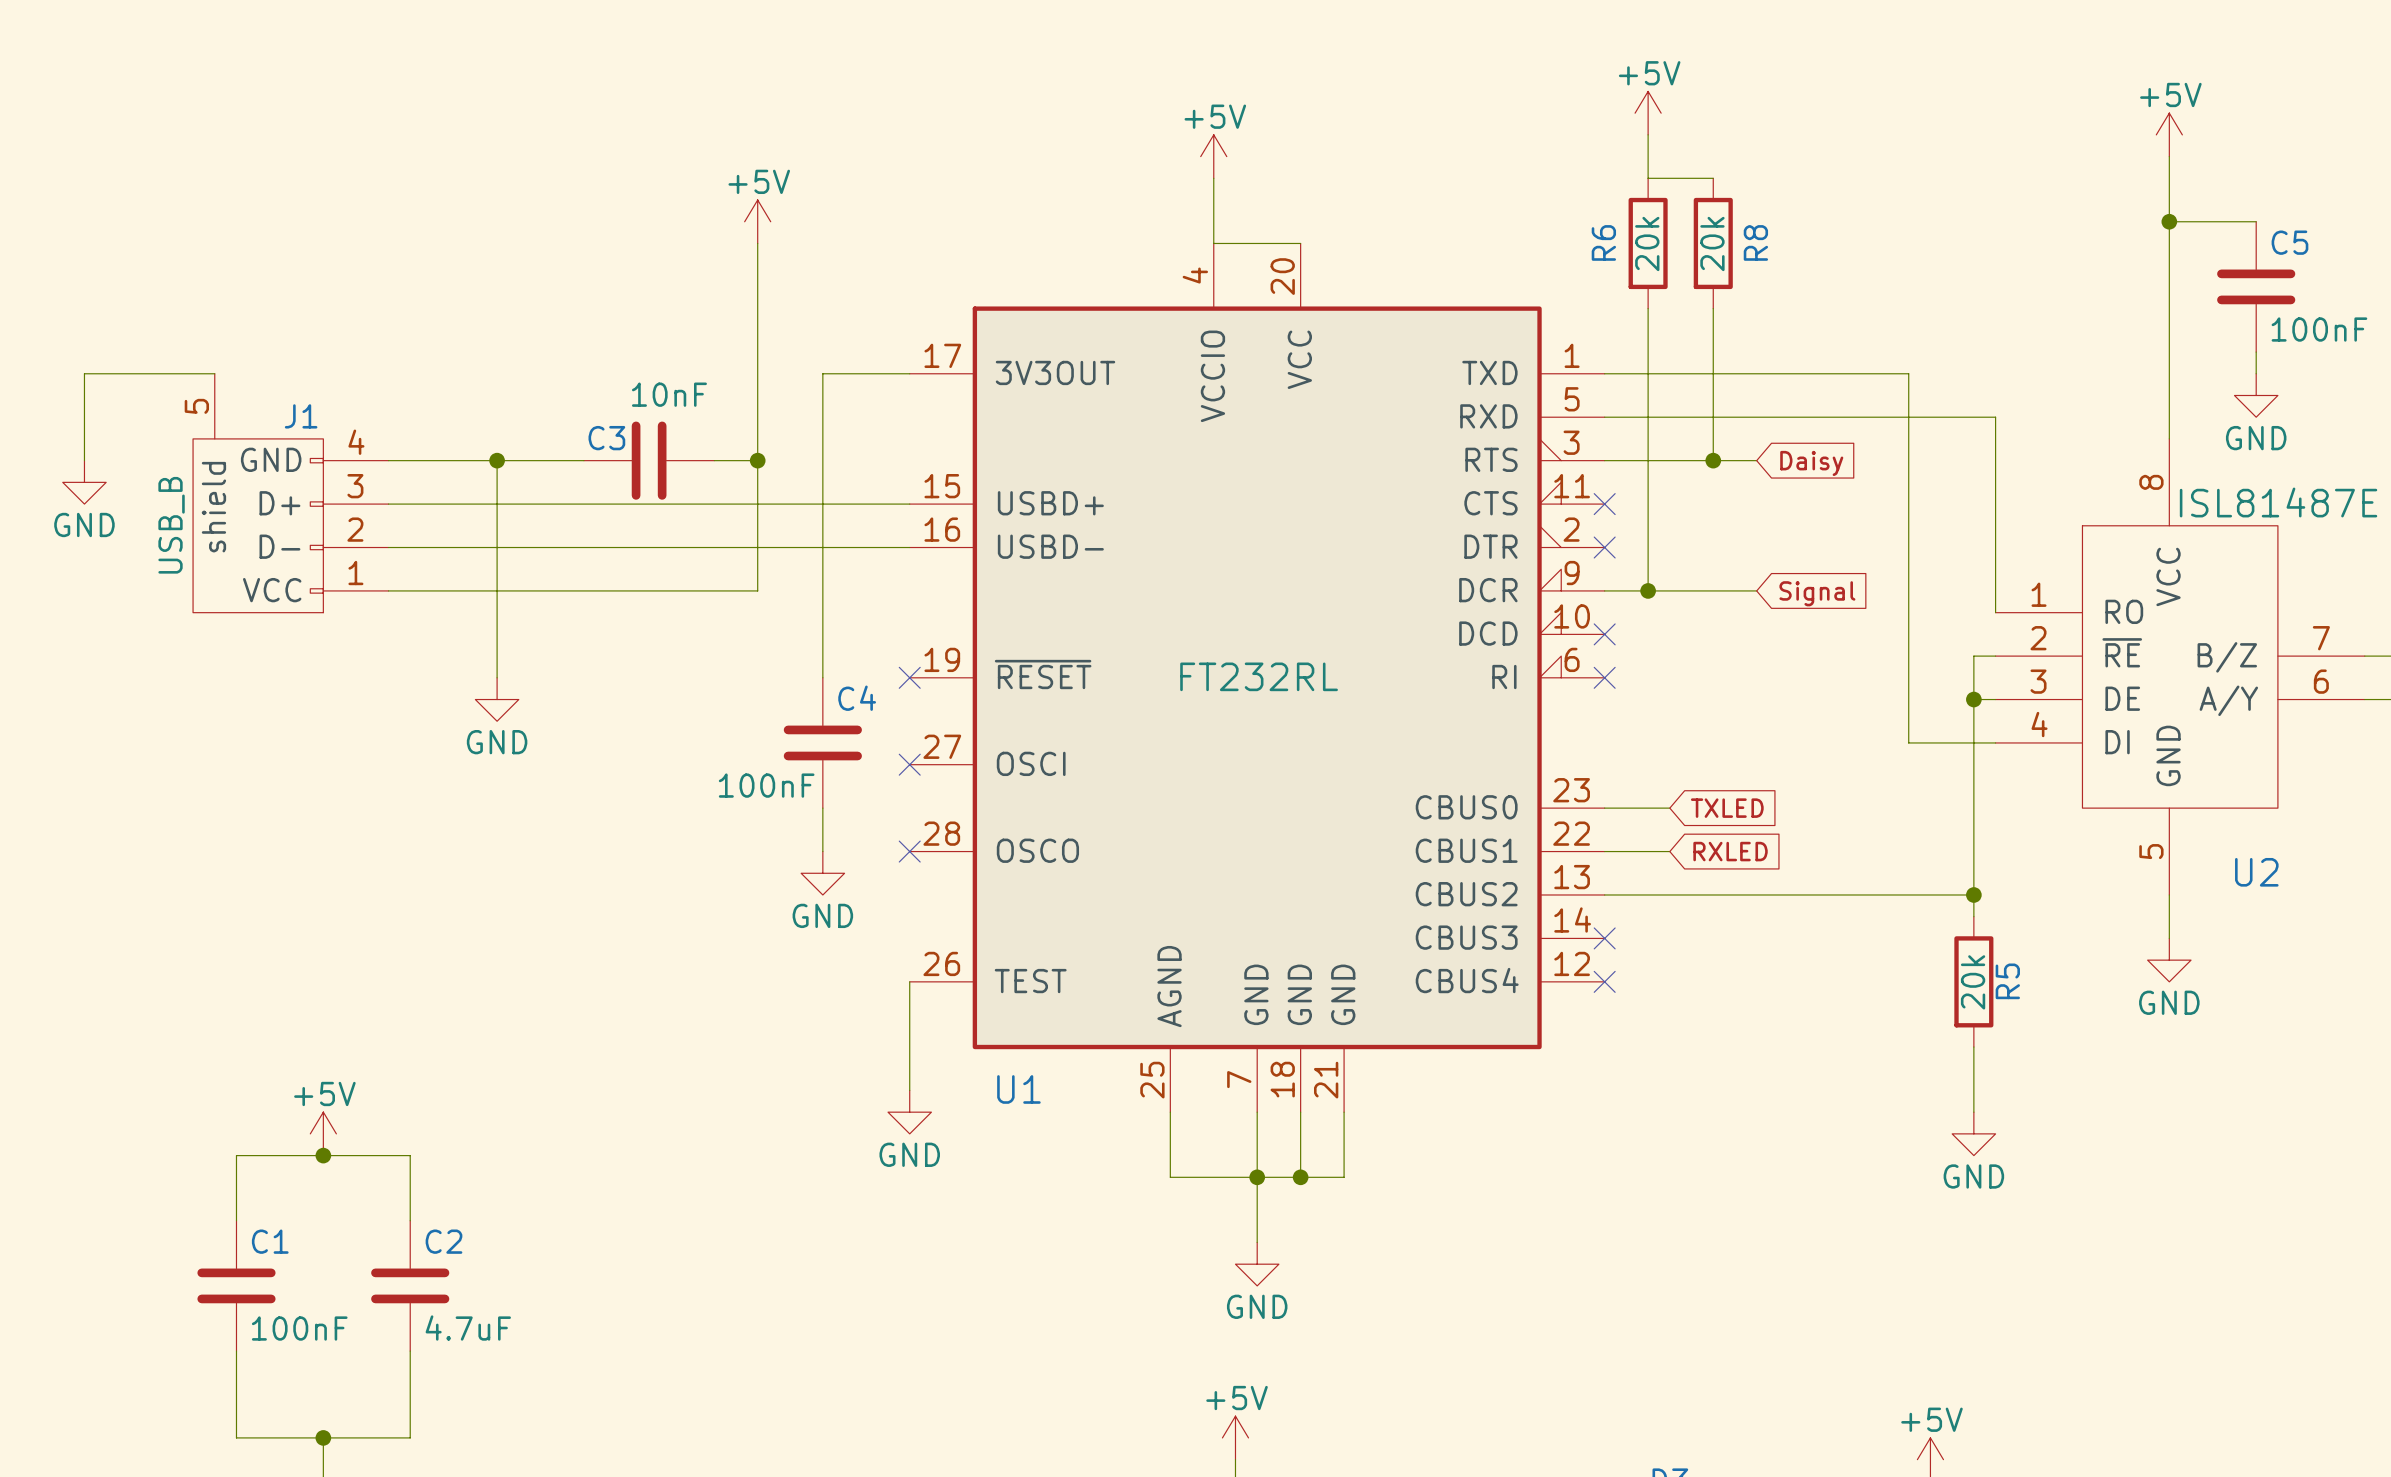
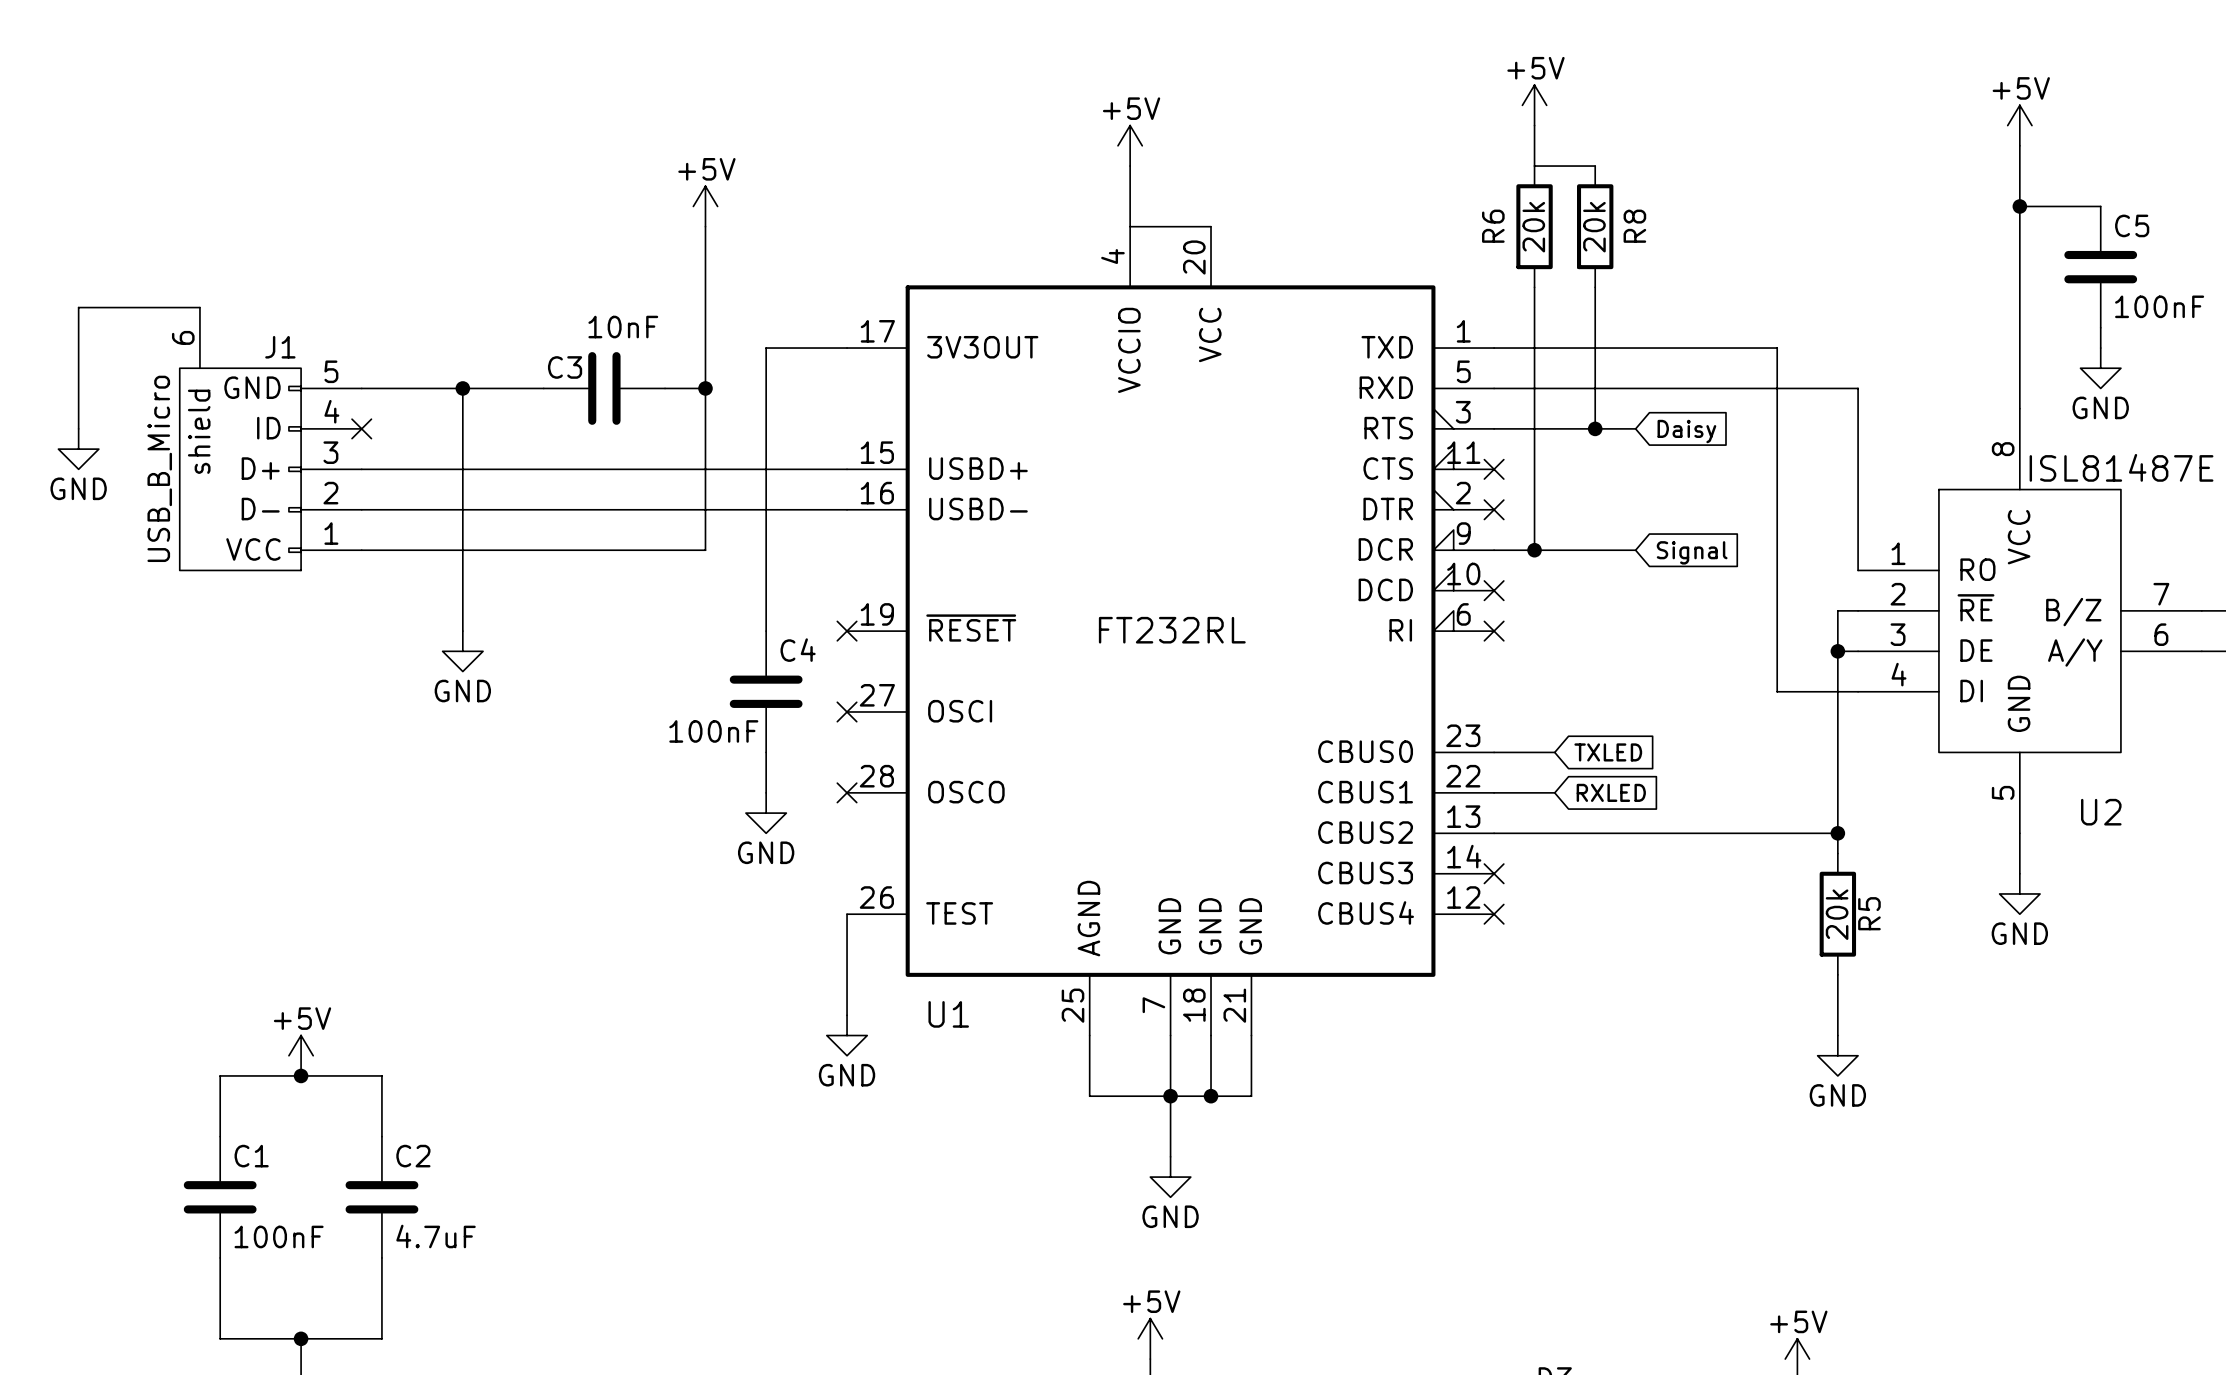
wire: (84, 373) (214, 373) -> (78, 348) (78, 307) (199, 307)
J1 symbol: [193, 373, 389, 613] -> [179, 307, 362, 571]
wire: none -> (462, 388) (462, 428)
wire: (388, 460) (583, 460) -> (361, 388) (543, 388)
no-connect mark: none -> (361, 428)
junction position: (497, 460) -> (462, 388)
C3 position: (649, 460) -> (604, 388)
wire: (714, 460) (757, 460) -> (665, 388) (705, 388)
junction position: (757, 460) -> (705, 388)
J1 value: USB_B (171, 525) -> USB_B_Micro (159, 468)

